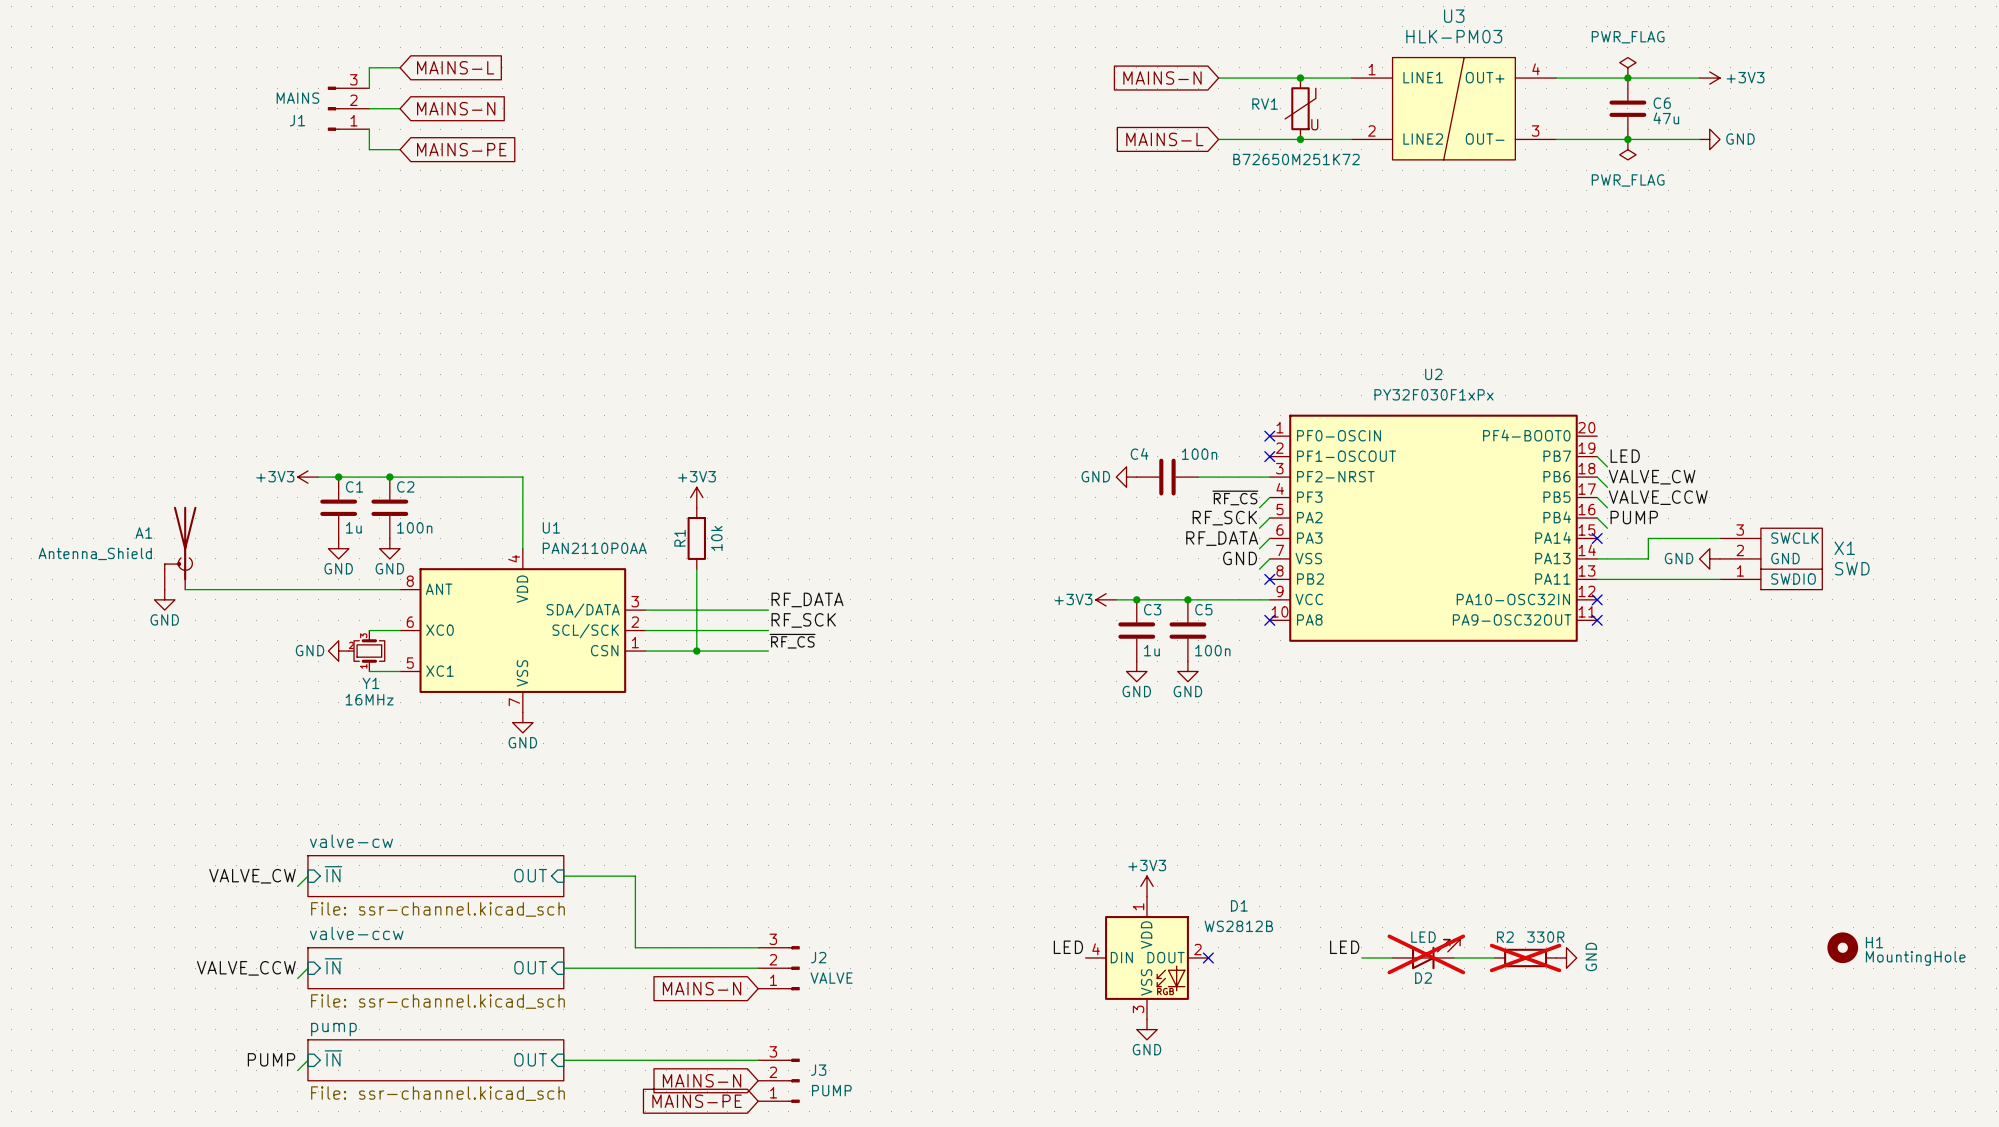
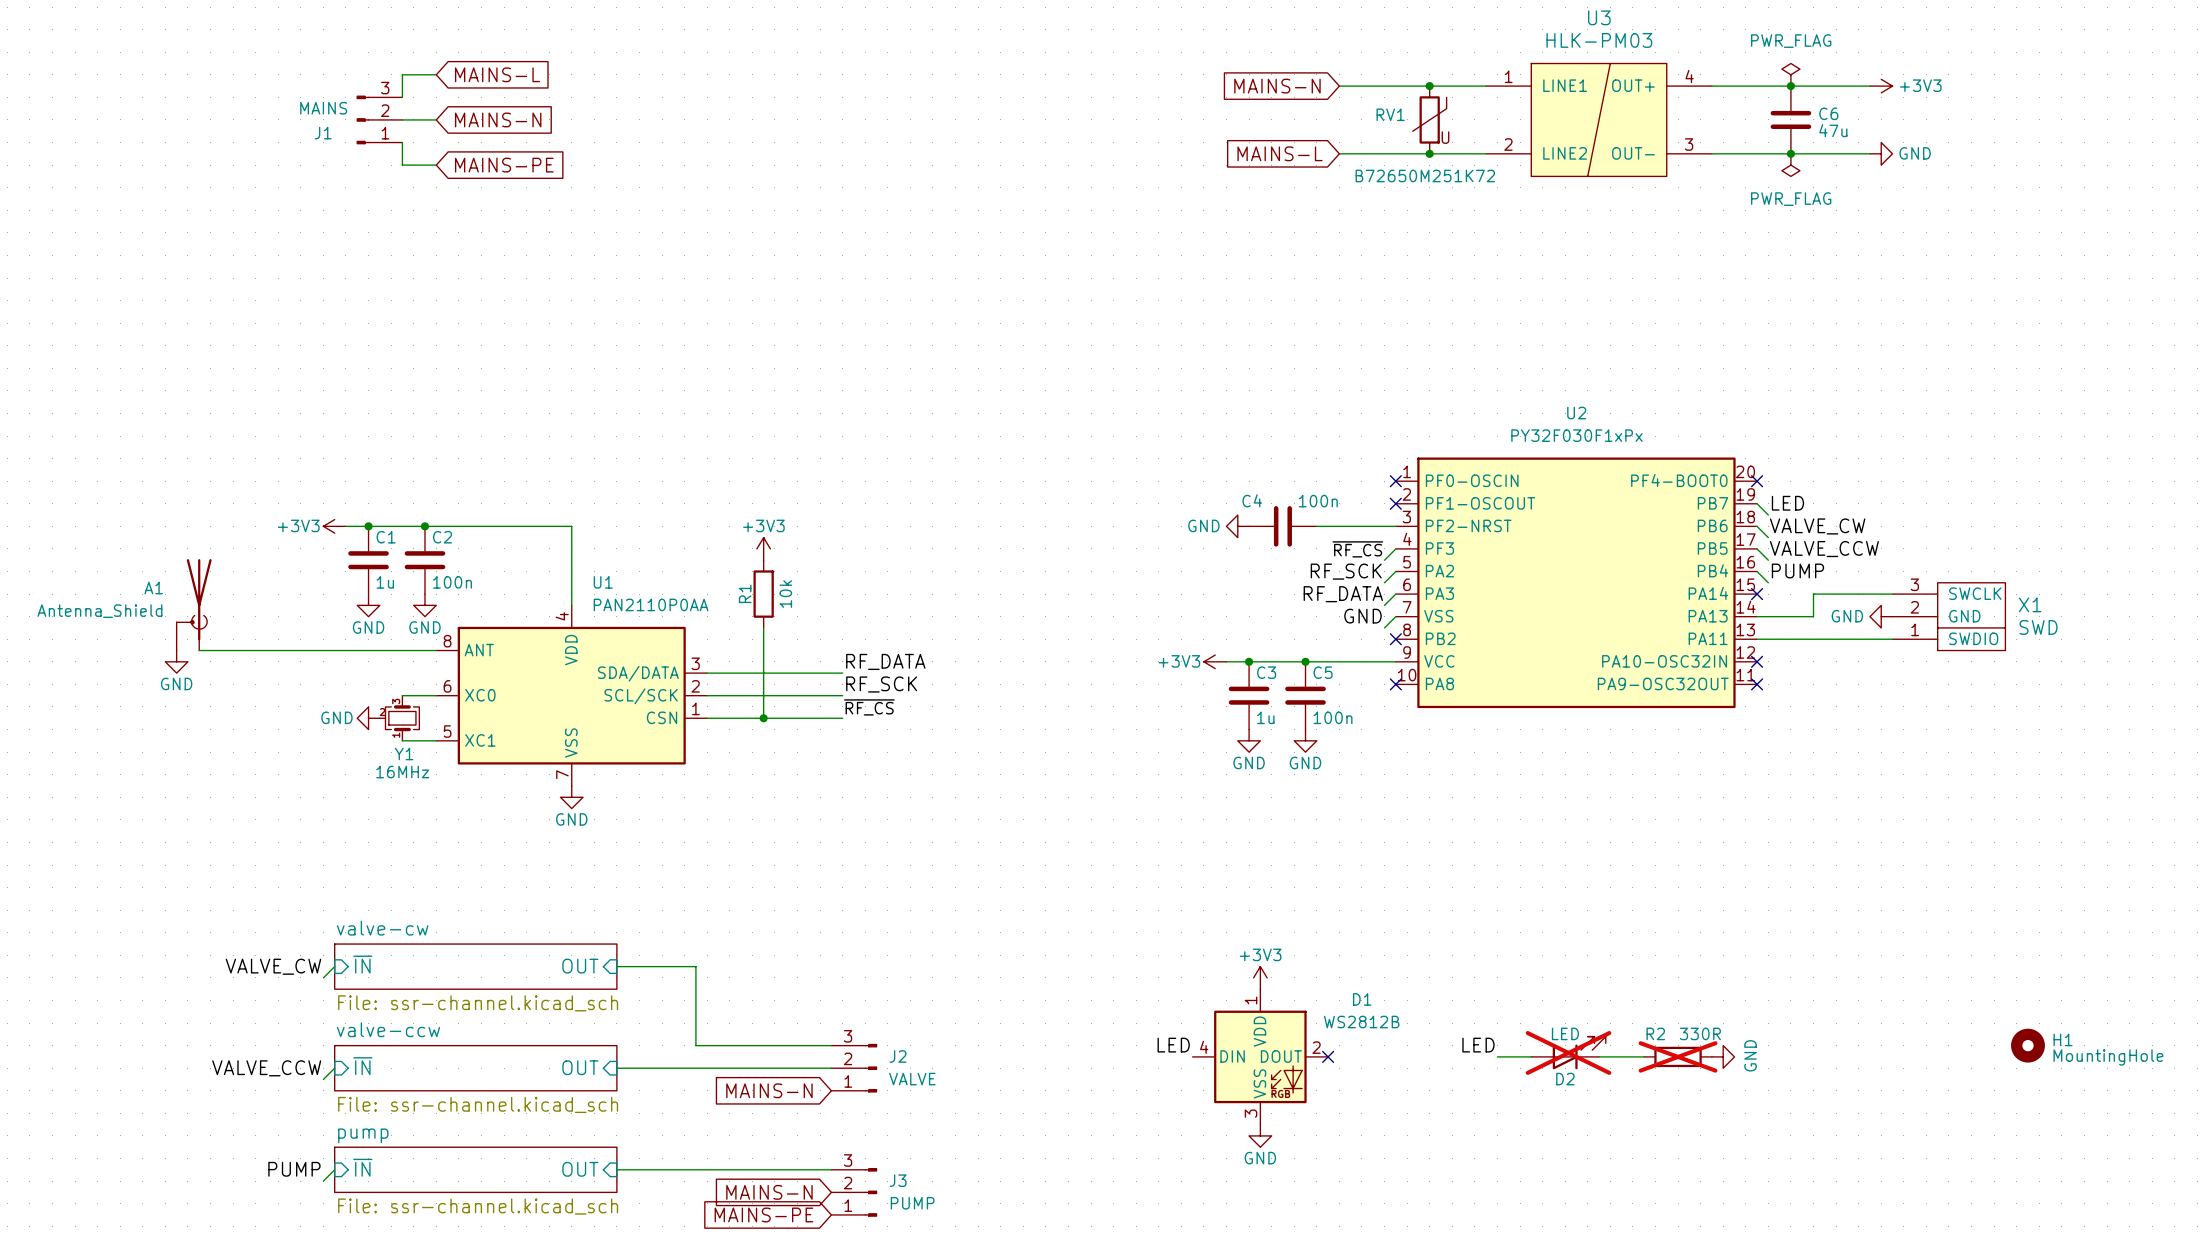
no-connect mark: none -> (1757, 481)

